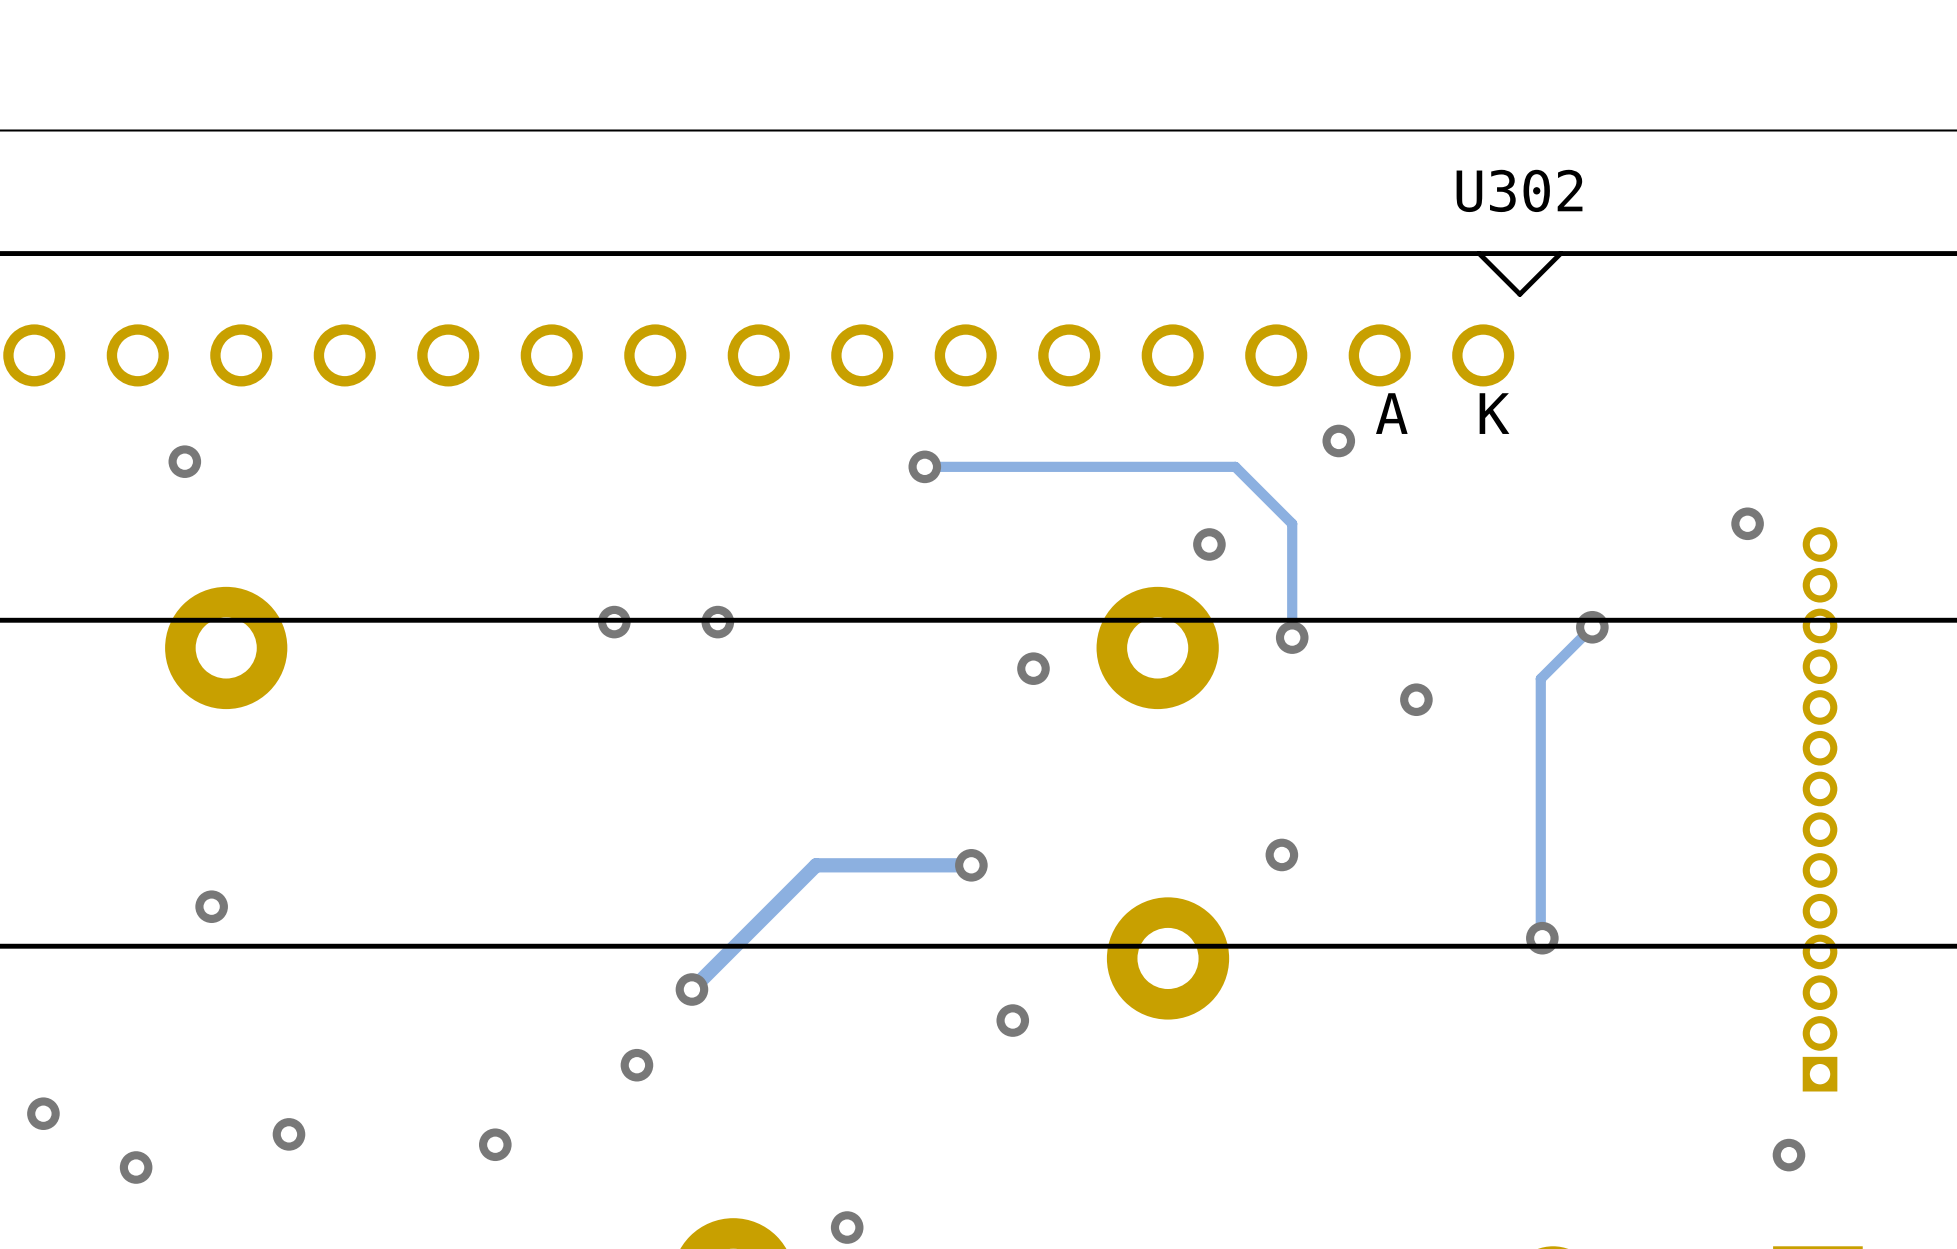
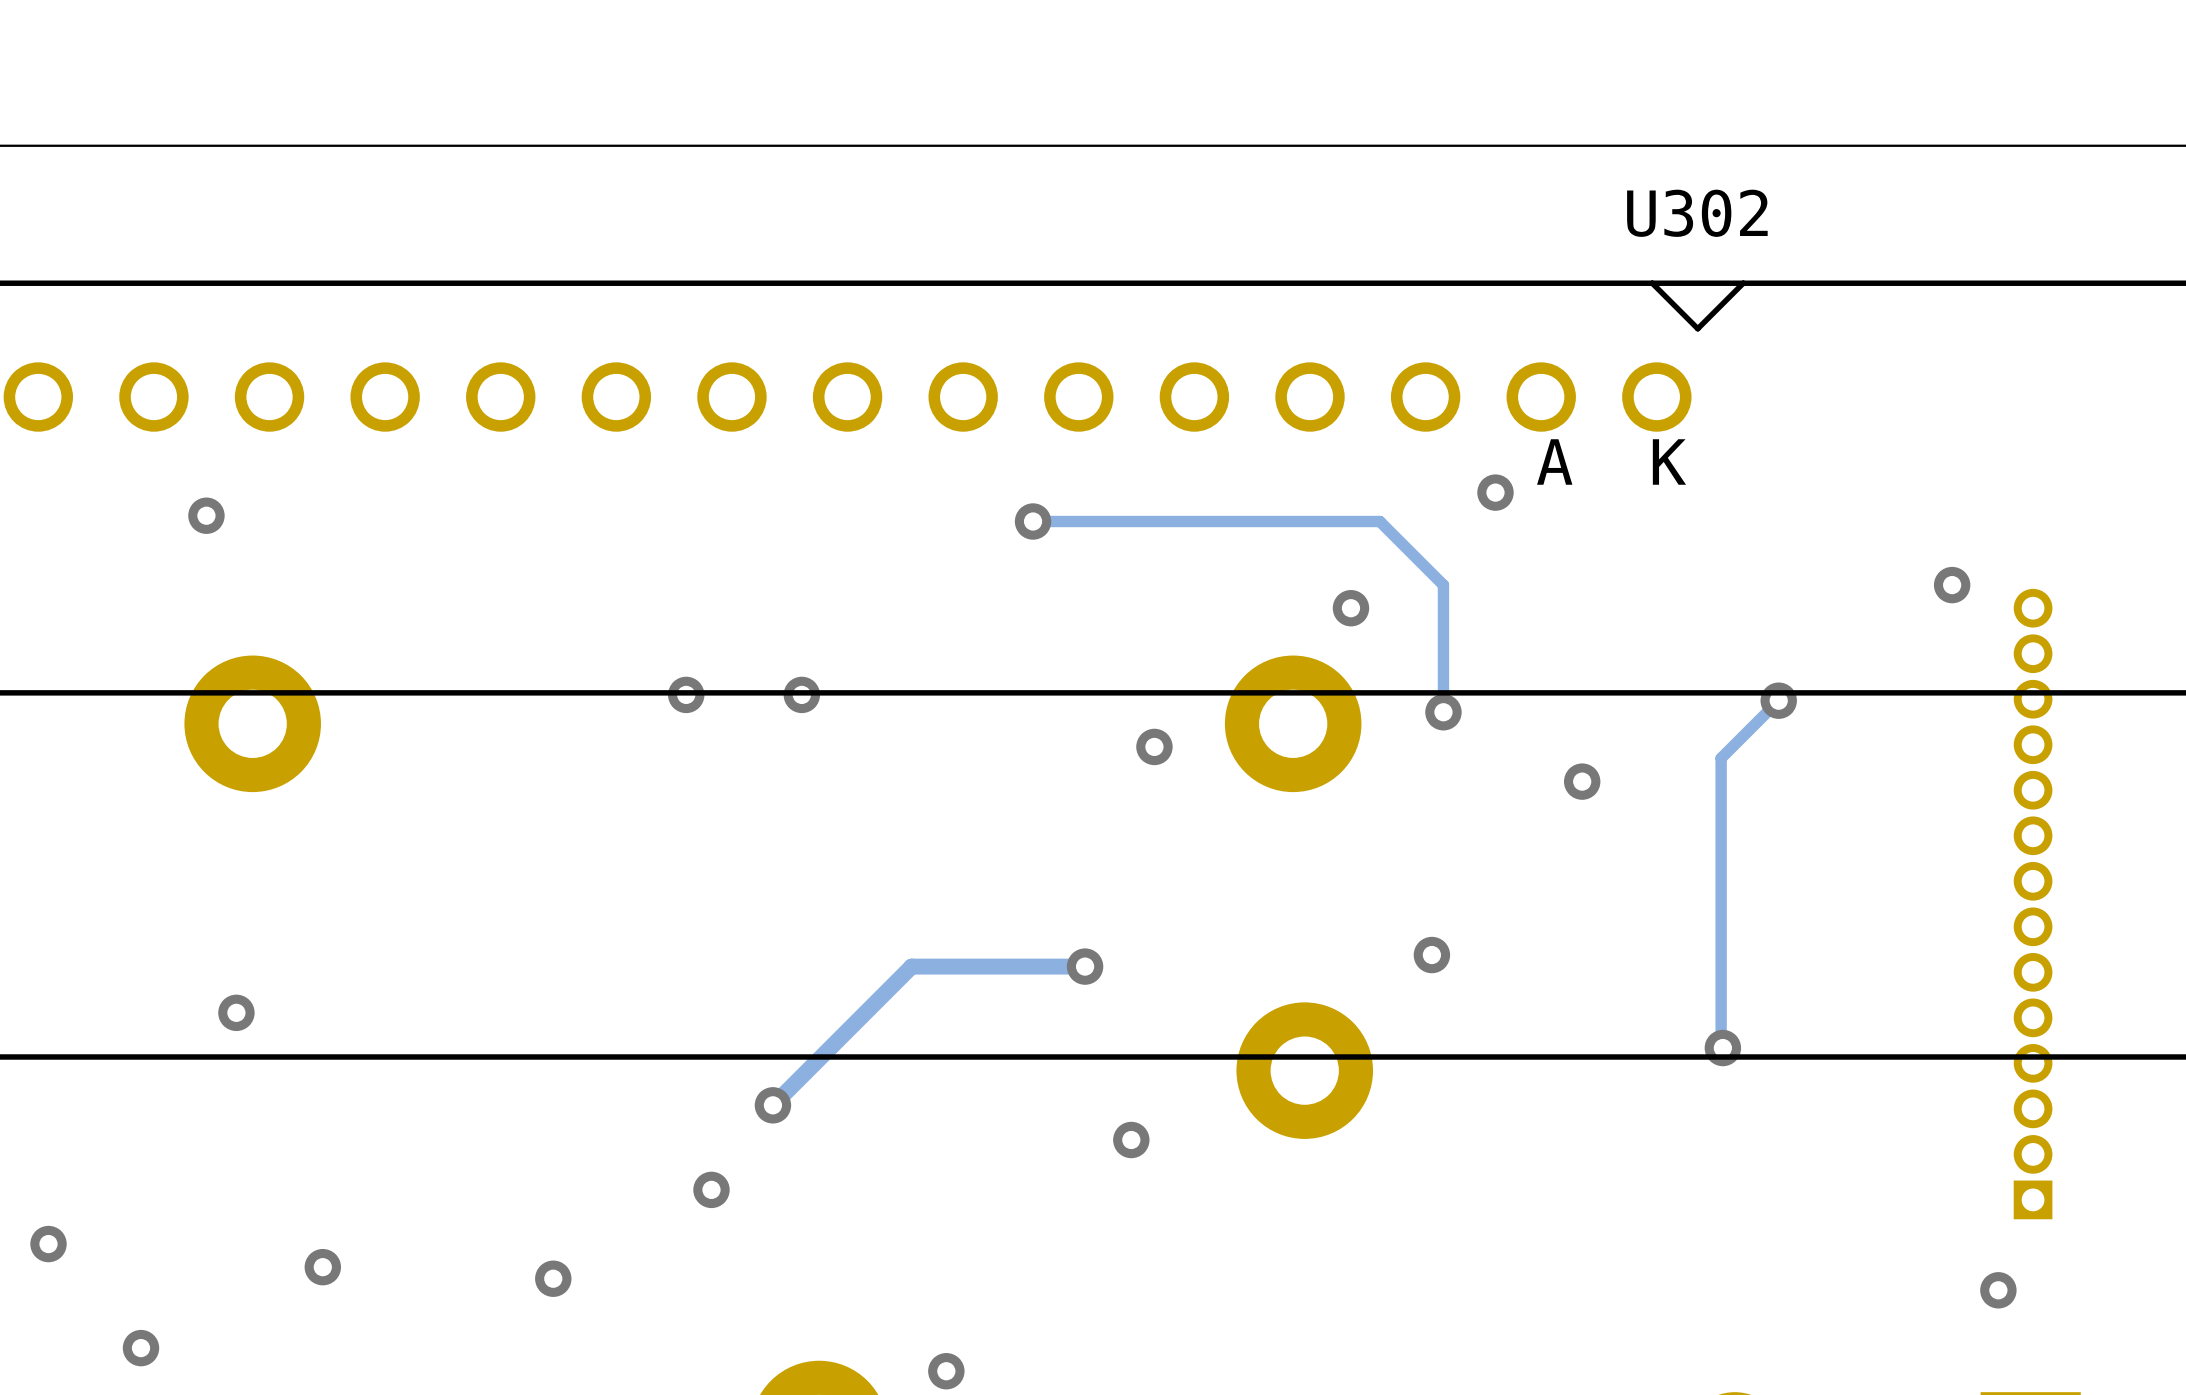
via position: (136, 1167) -> (141, 1348)

